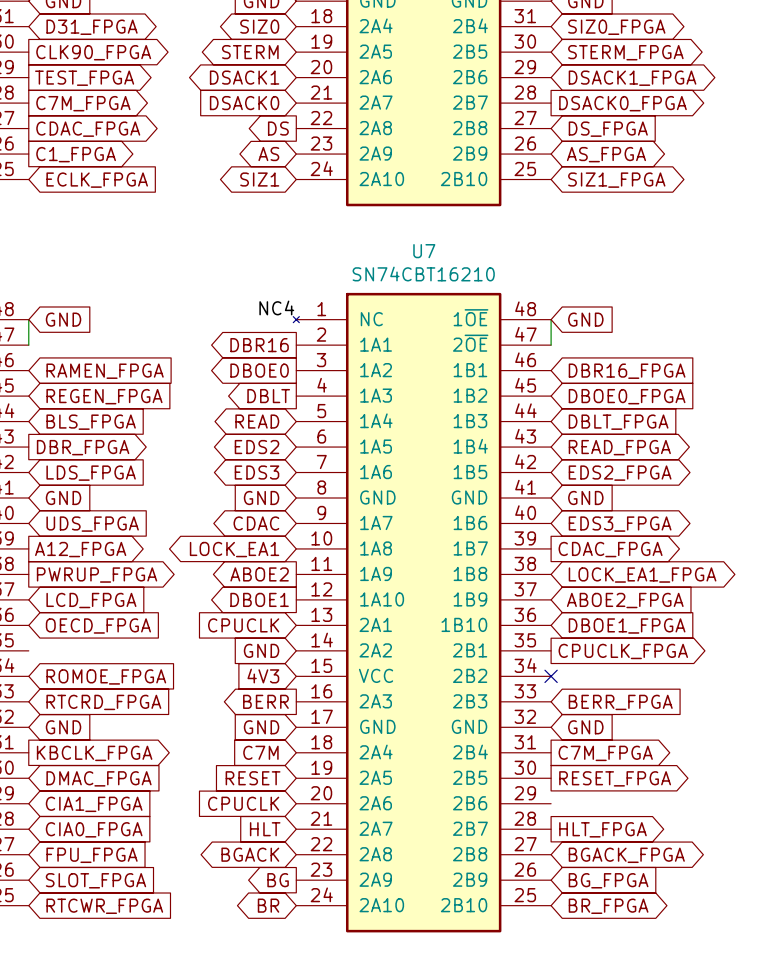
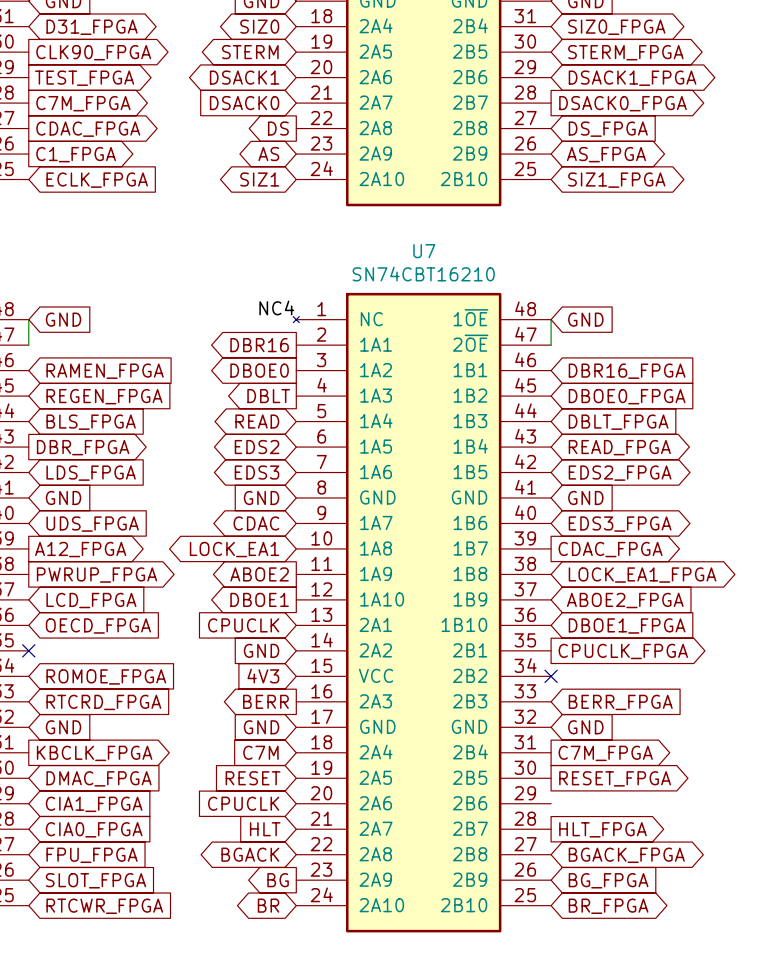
no-connect mark: none -> (28, 650)

